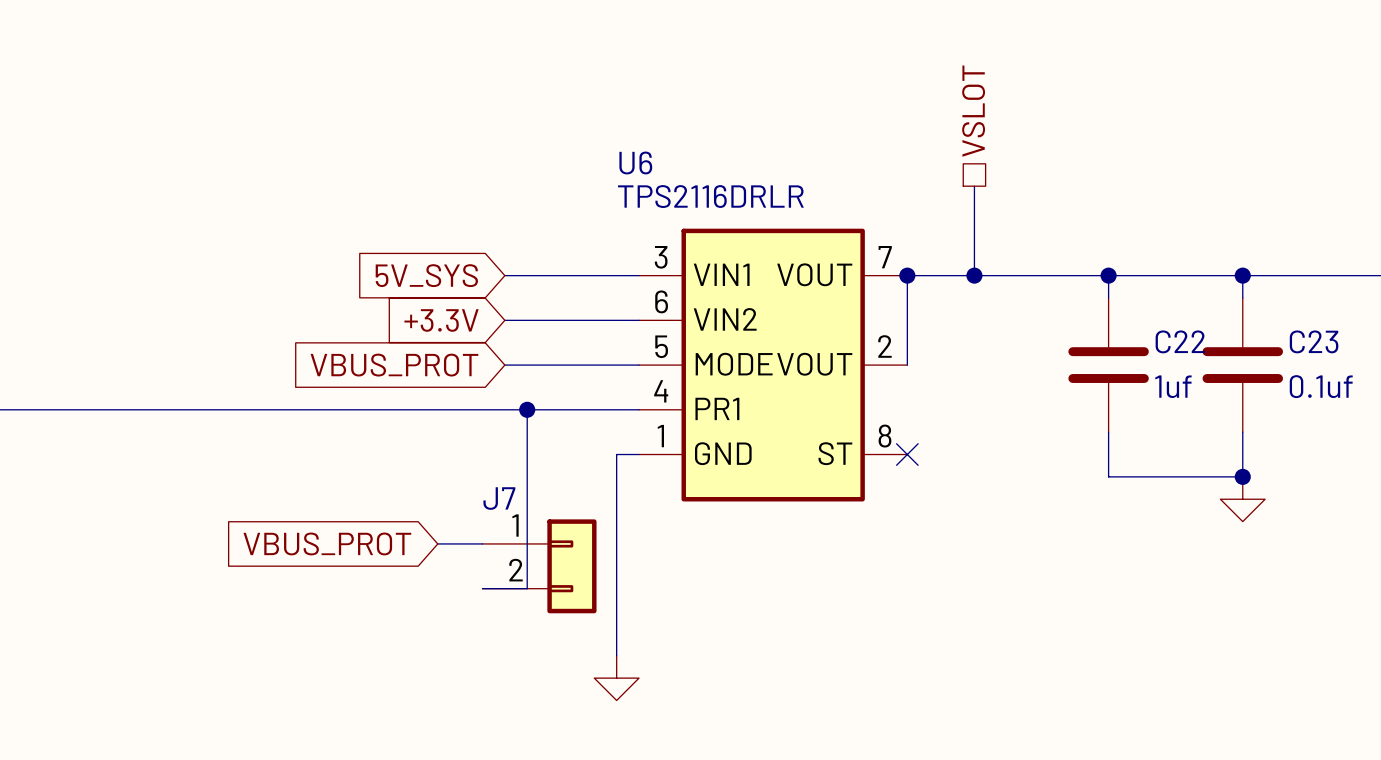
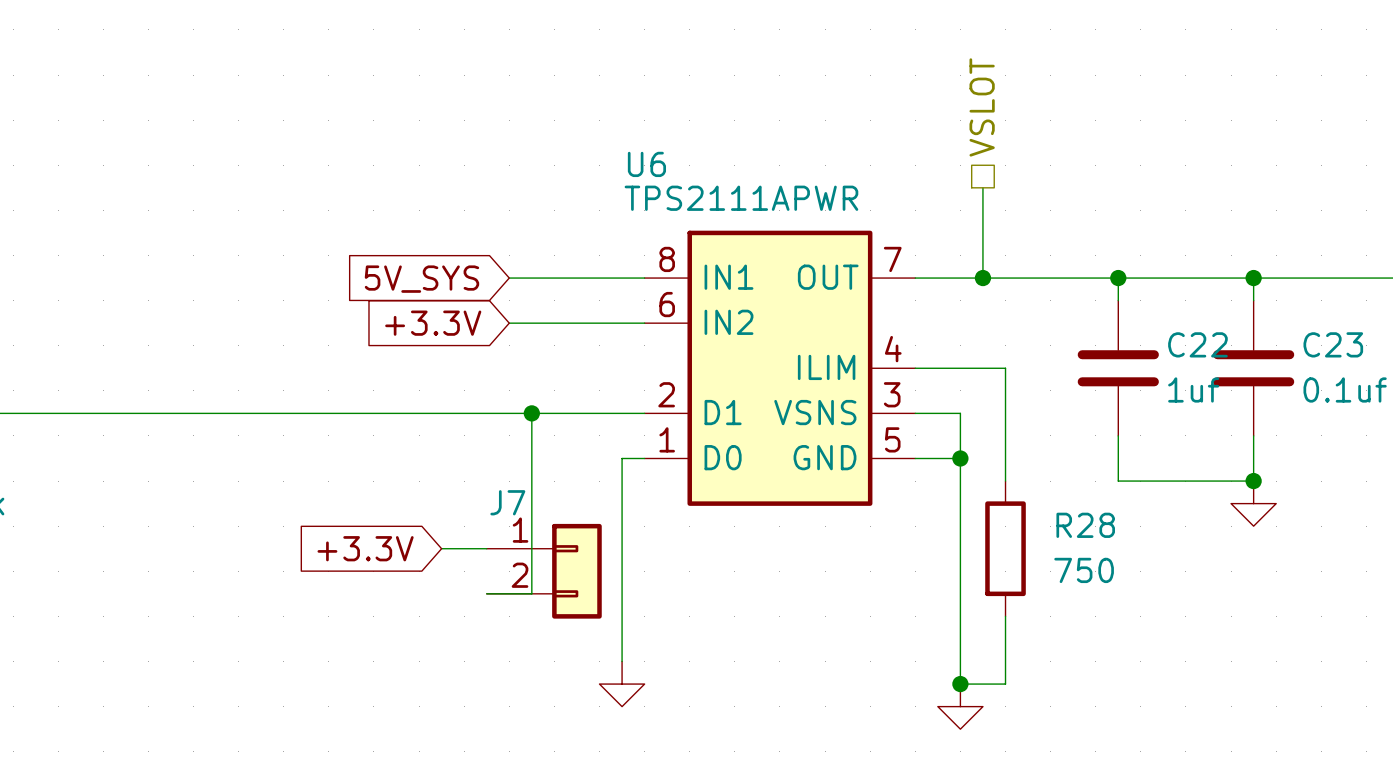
U6 value: TPS2116DRLR (710, 196) -> TPS2111APWR (741, 198)
U6 symbol: [639, 228, 908, 502] -> [644, 230, 916, 506]
wire: (907, 275) (907, 365) -> (1005, 481) (1005, 368) (915, 368)
junction: (907, 275) -> none
global label: VBUS_PROT (394, 365) -> none
wire: (504, 365) (639, 365) -> none
wire: none -> (915, 413) (960, 413) (960, 684) (1005, 684) (1005, 616)
wire: none -> (915, 458) (960, 458)
no-connect mark: (907, 454) -> none
junction: none -> (960, 458)
global label: VBUS_PROT (327, 543) -> +3.3V (365, 548)
R28: none -> 750 (1005, 548)
junction: none -> (960, 684)
power symbol: none -> (960, 706)

